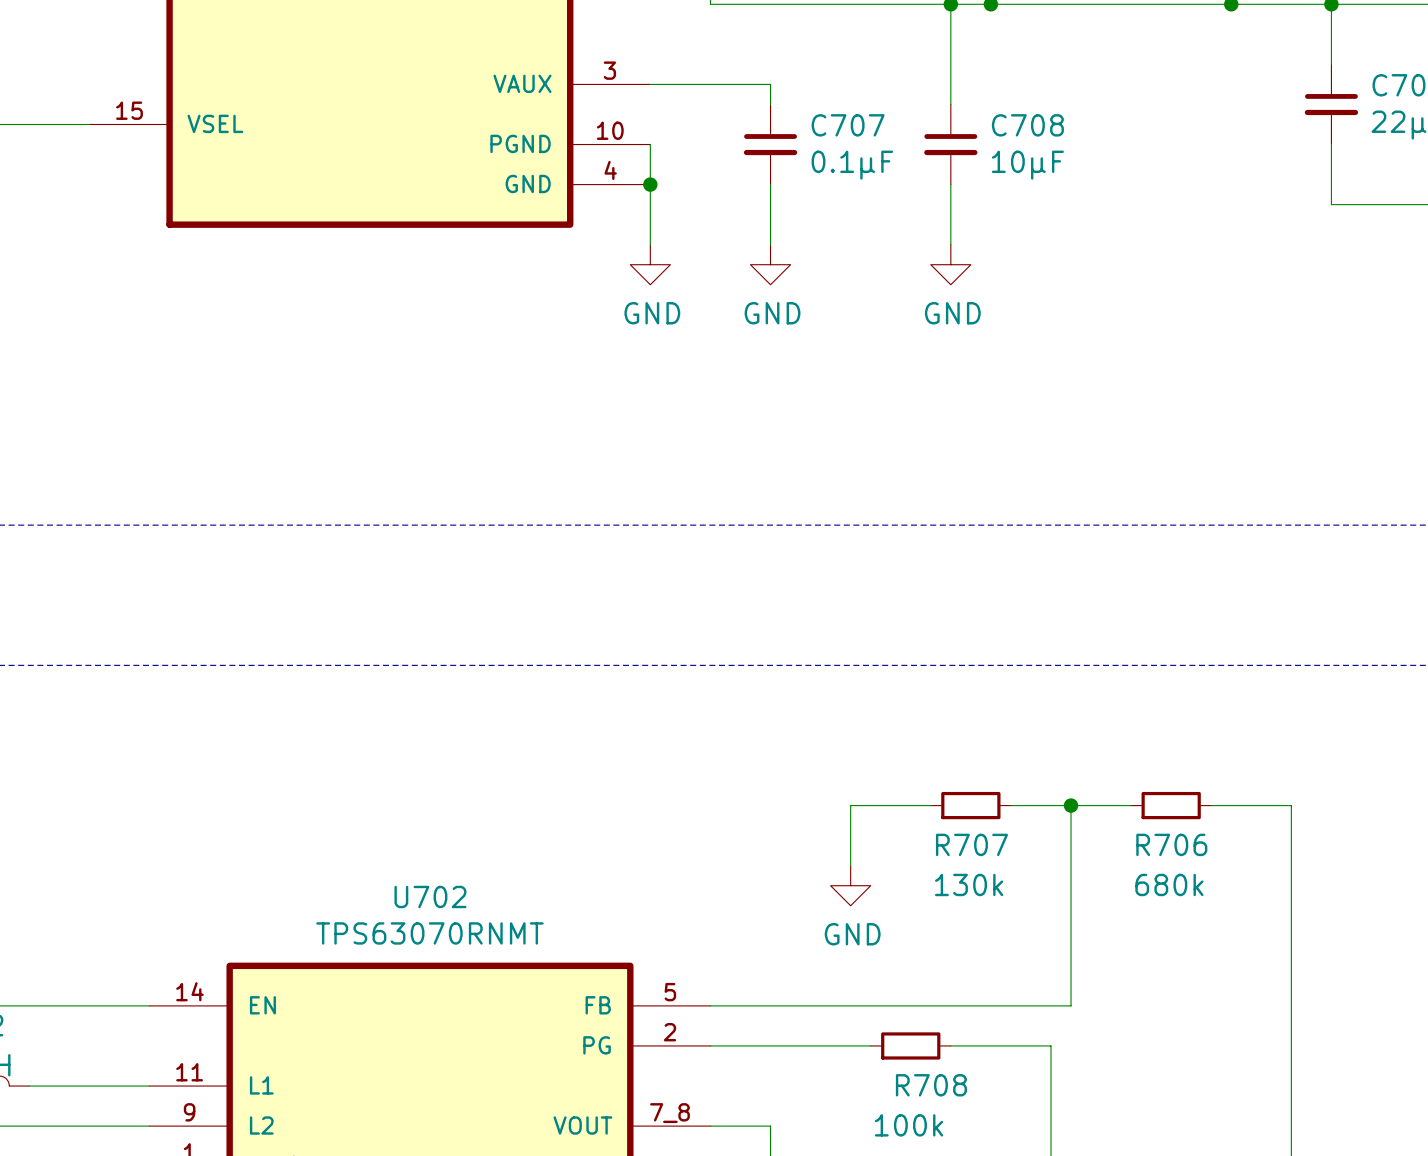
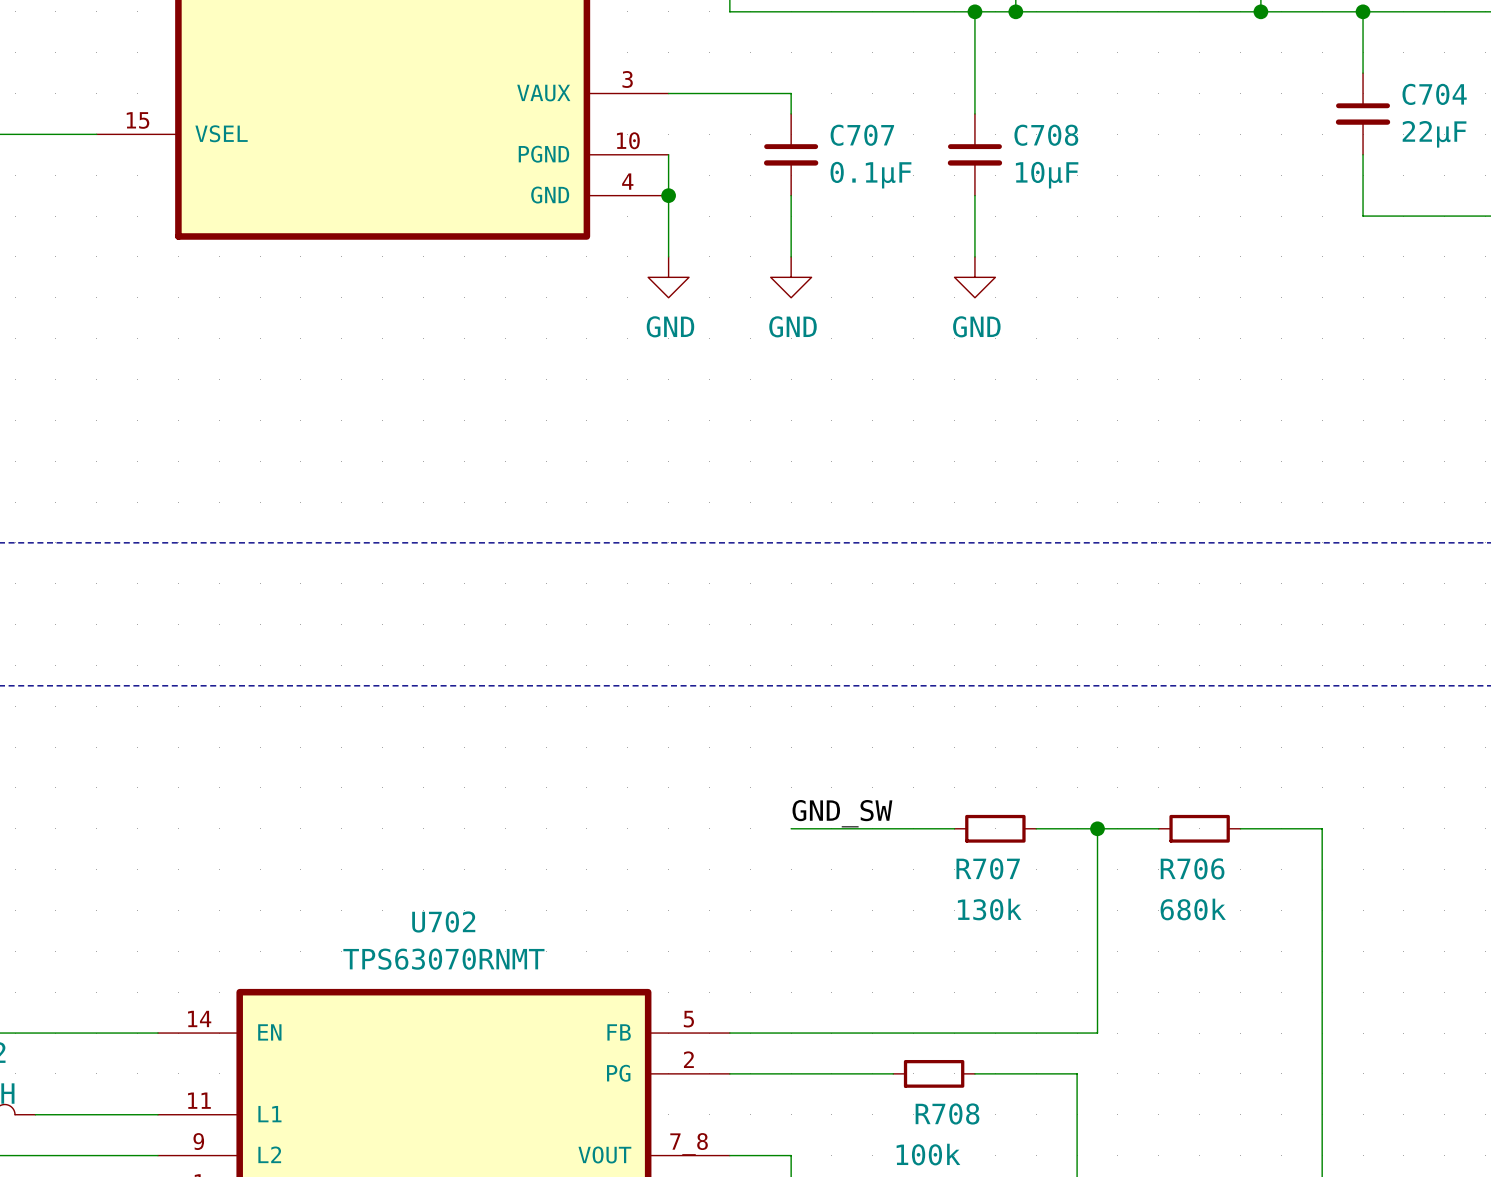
label: none -> GND_SW (842, 813)
wire: (850, 805) (850, 865) -> (872, 828) (791, 828)
power symbol: GND (850, 885) -> none

